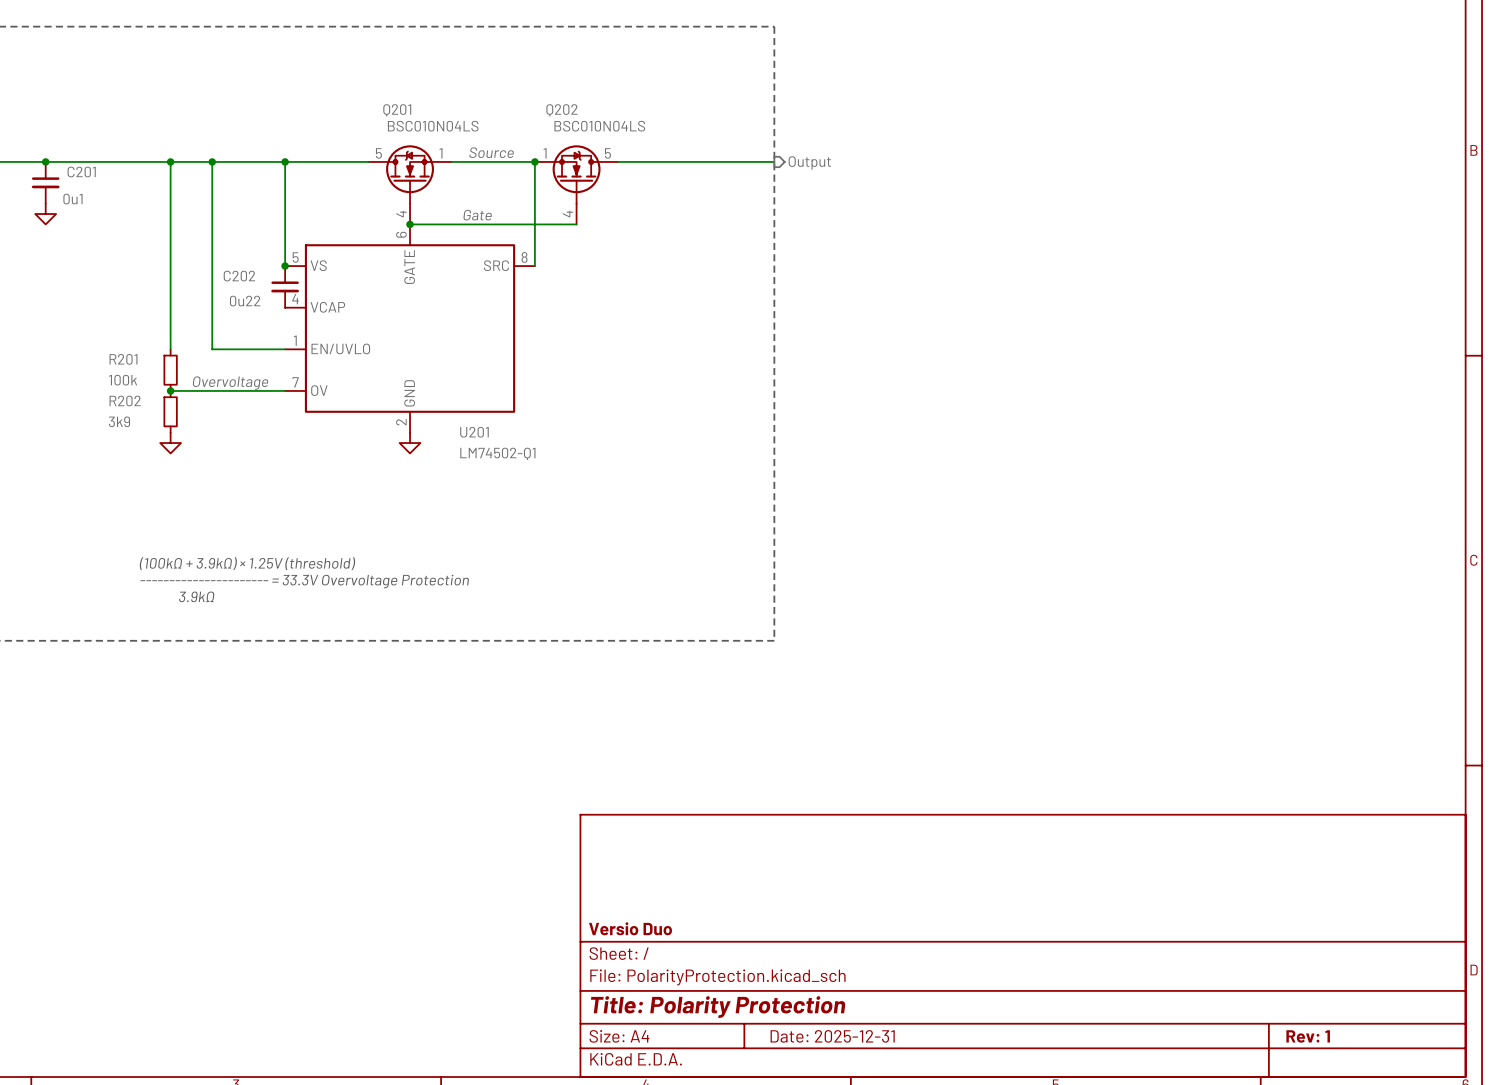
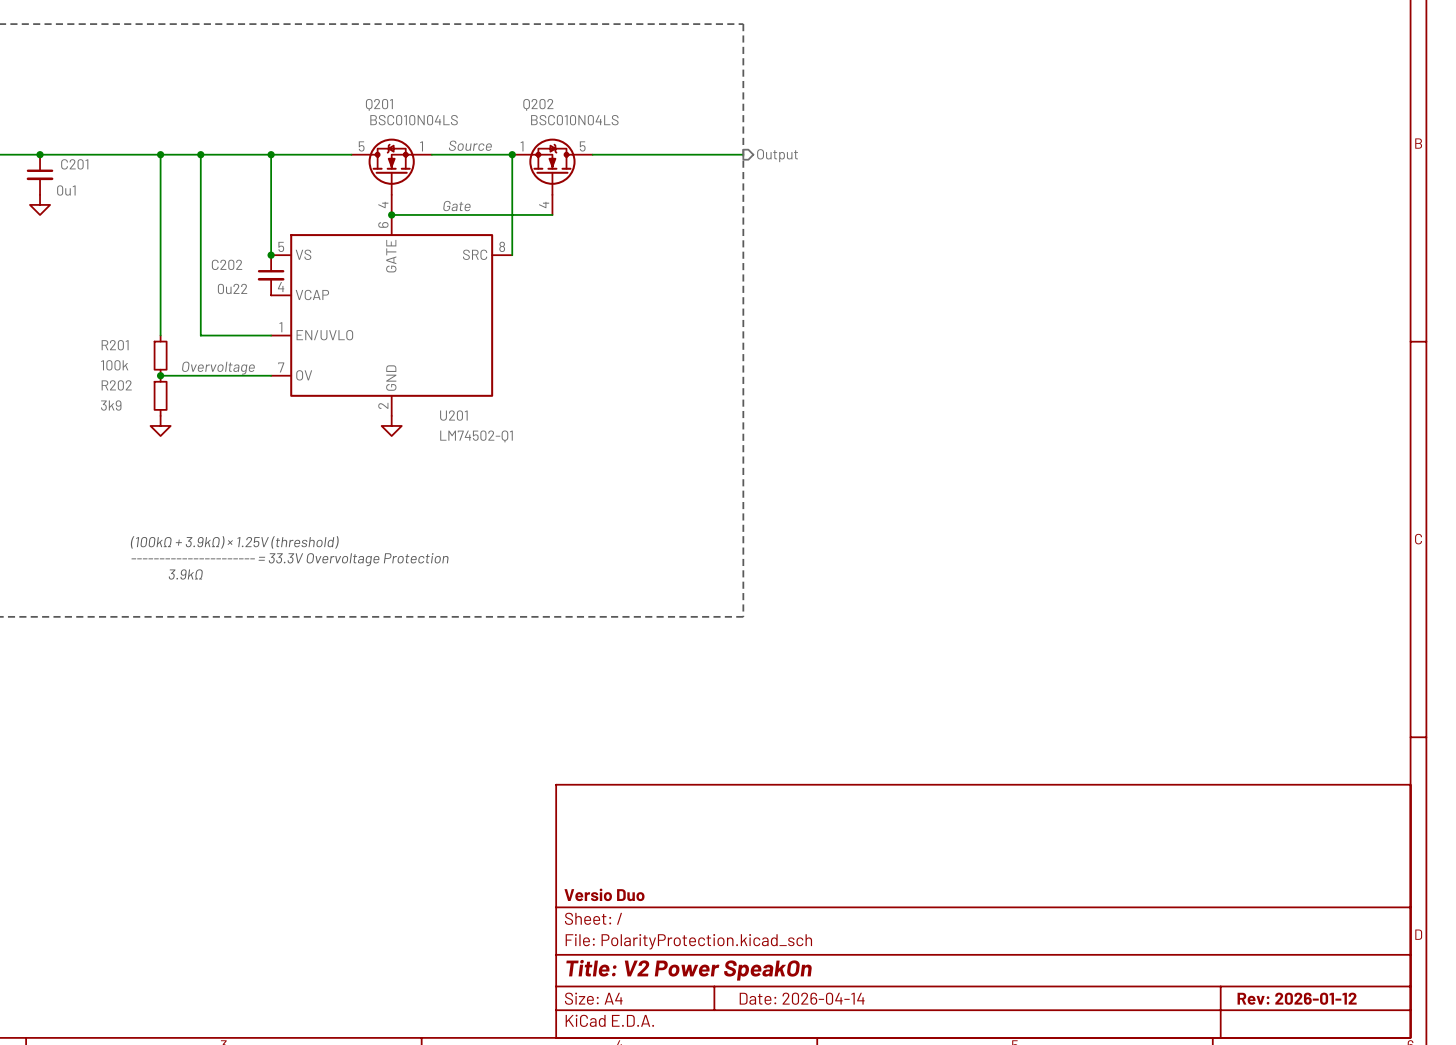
title block: Title: Polarity Protection (718, 1007) -> Title: V2 Power SpeakOn (689, 970)
title block: Date: 2025-12-31 (832, 1036) -> Date: 2026-04-14 (802, 998)
title block: Rev: 1 (1308, 1036) -> Rev: 2026-01-12 (1297, 998)

